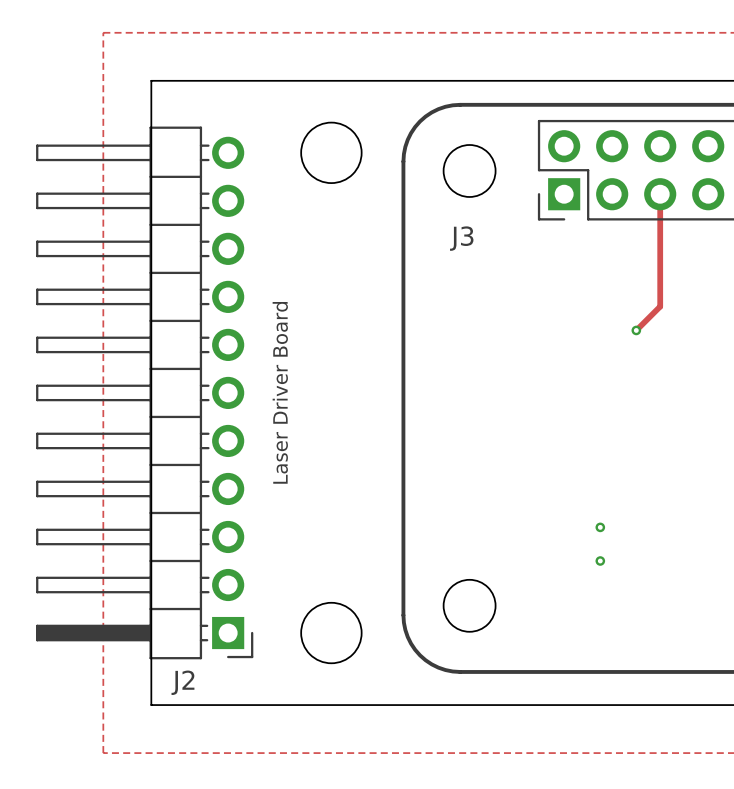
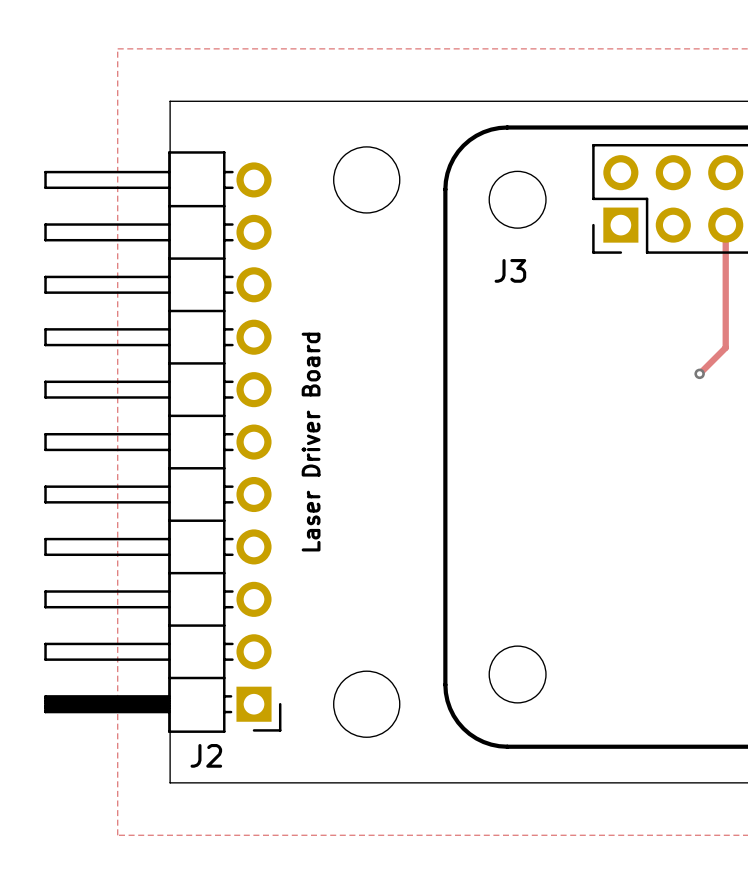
via: (600, 527) -> none
via: (600, 561) -> none

